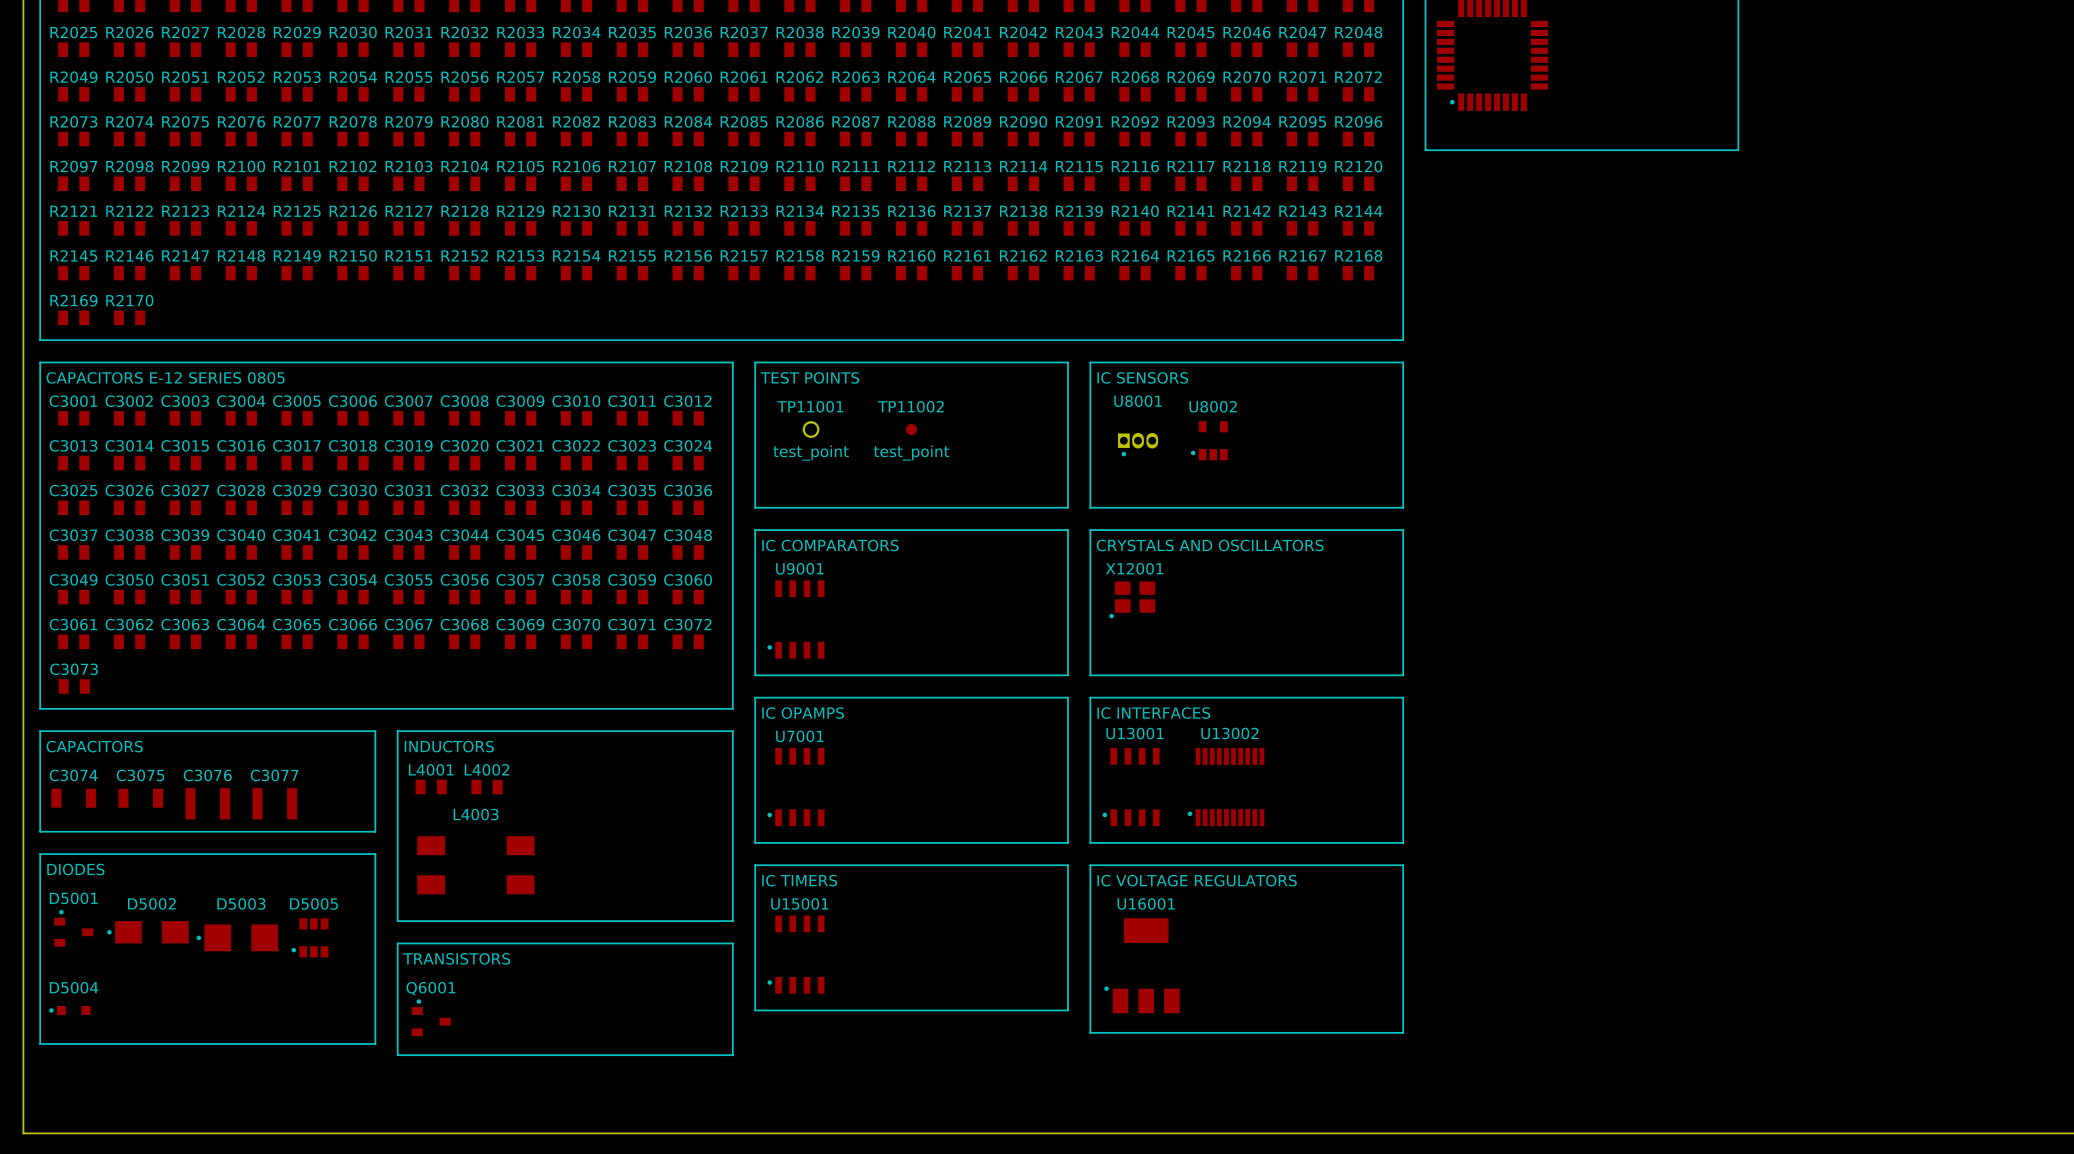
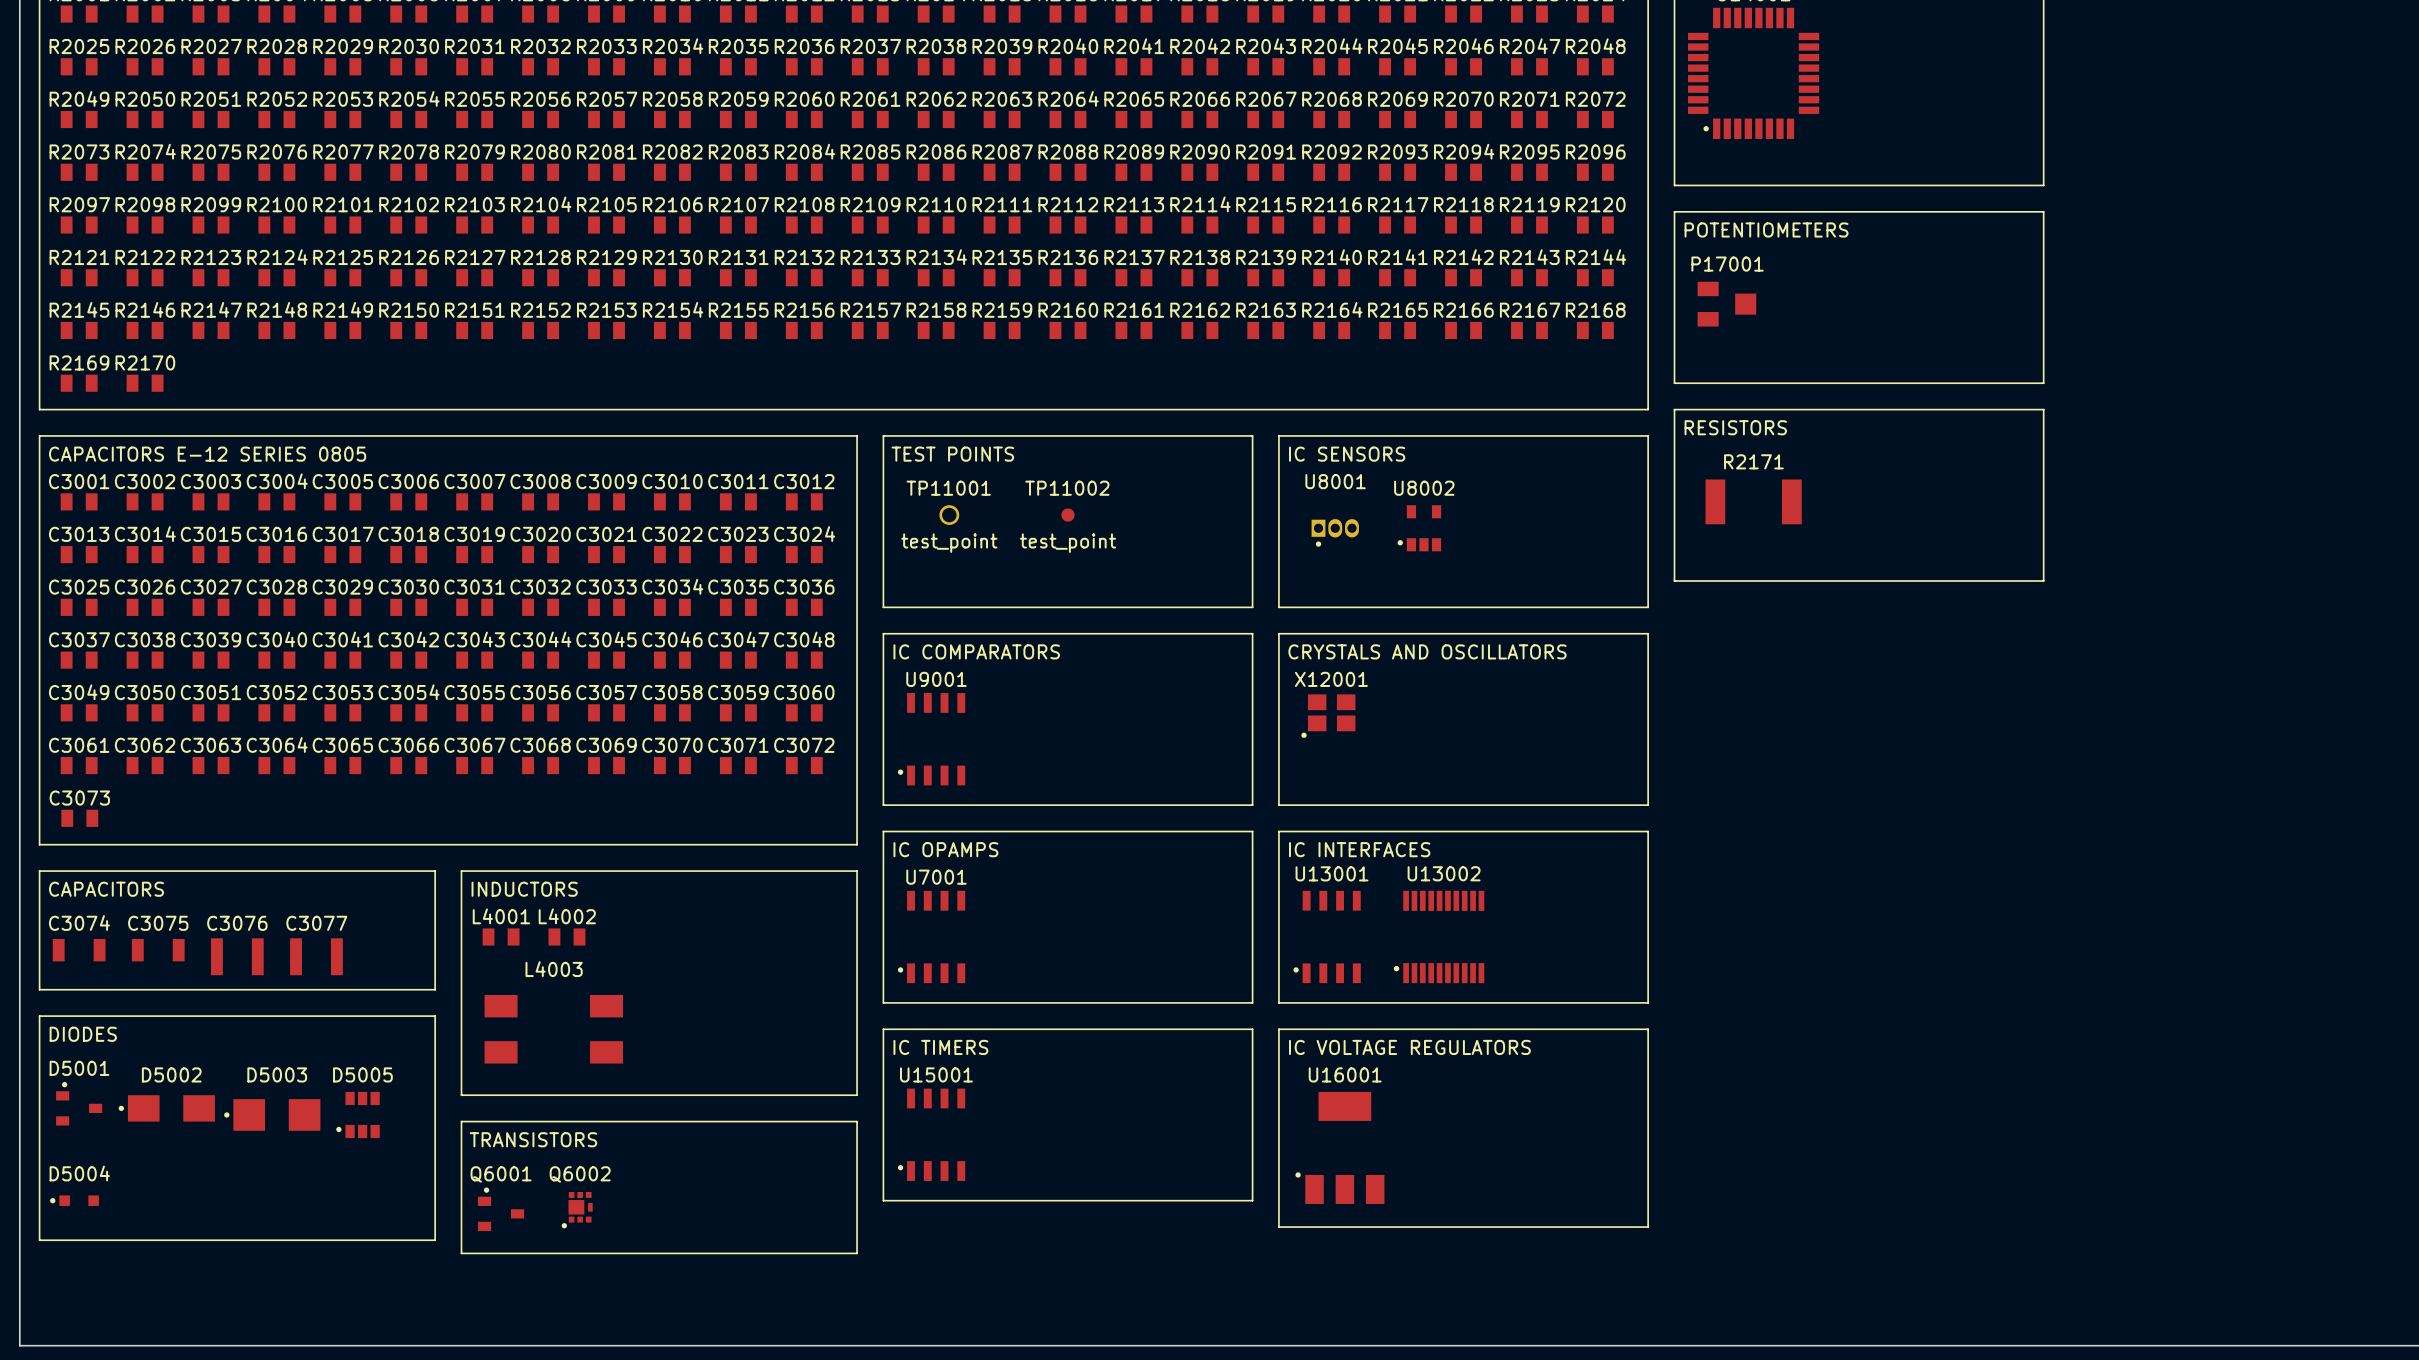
line: none -> (1674, 211) (2043, 211) (2043, 383) (1674, 383) (1674, 211)
text: none -> POTENTIOMETERS (1766, 229)
P17001: none -> (1726, 304)
line: none -> (1674, 409) (1674, 580) (2043, 580) (2043, 409) (1674, 409)
text: none -> RESISTORS (1735, 427)
R2171: none -> (1753, 501)
Q6002: none -> (577, 1210)

